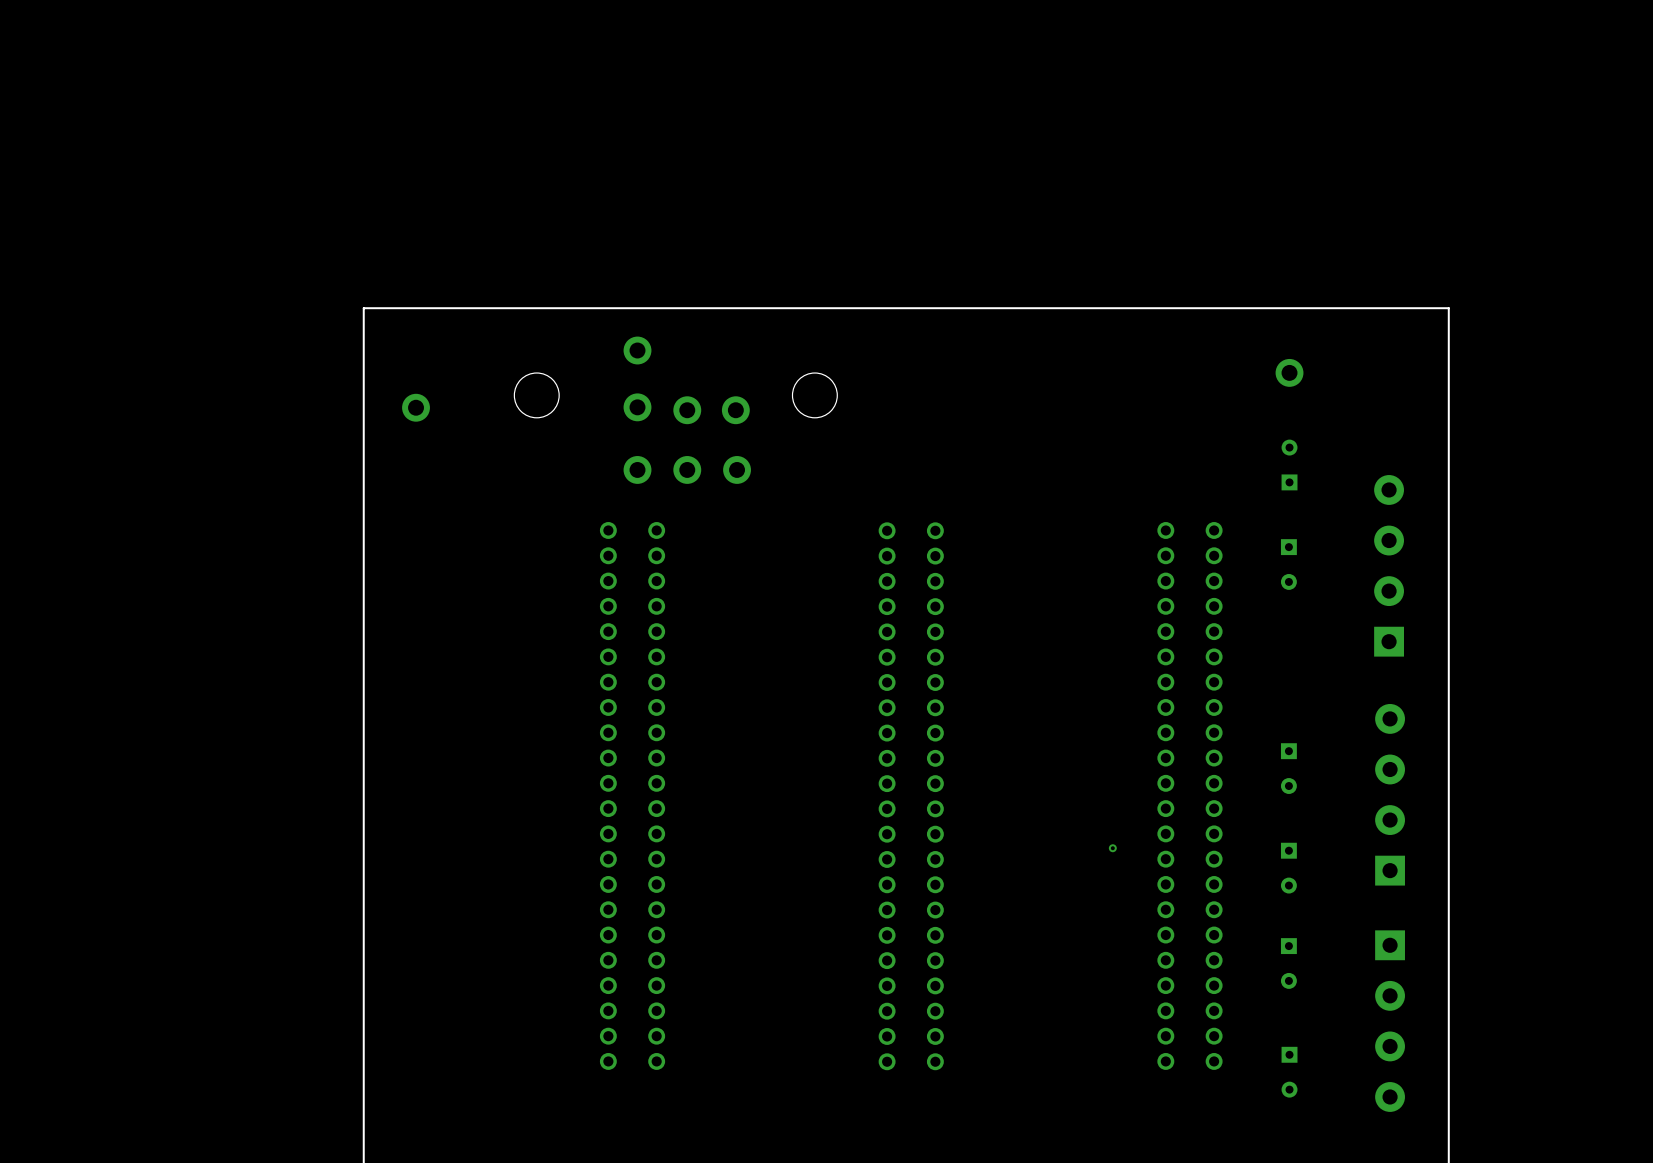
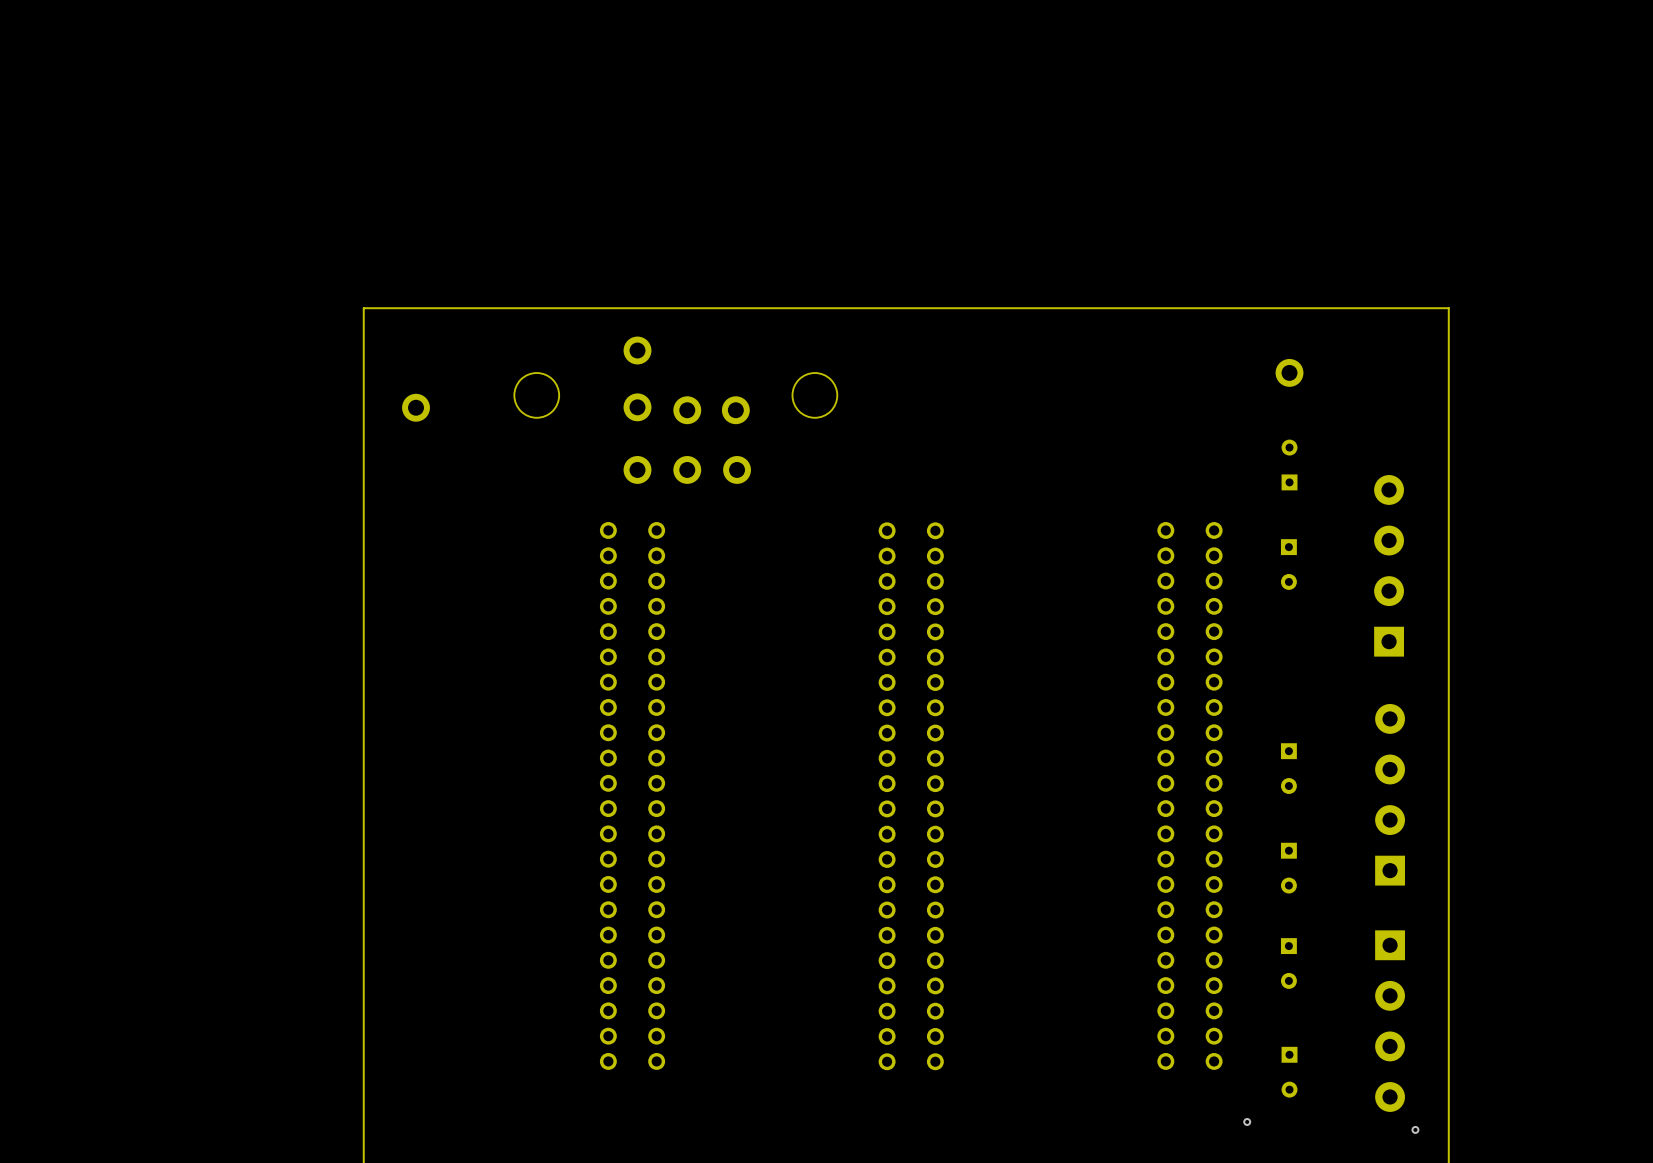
via: (1112, 848) -> none
via: none -> (1247, 1121)
via: none -> (1415, 1129)

